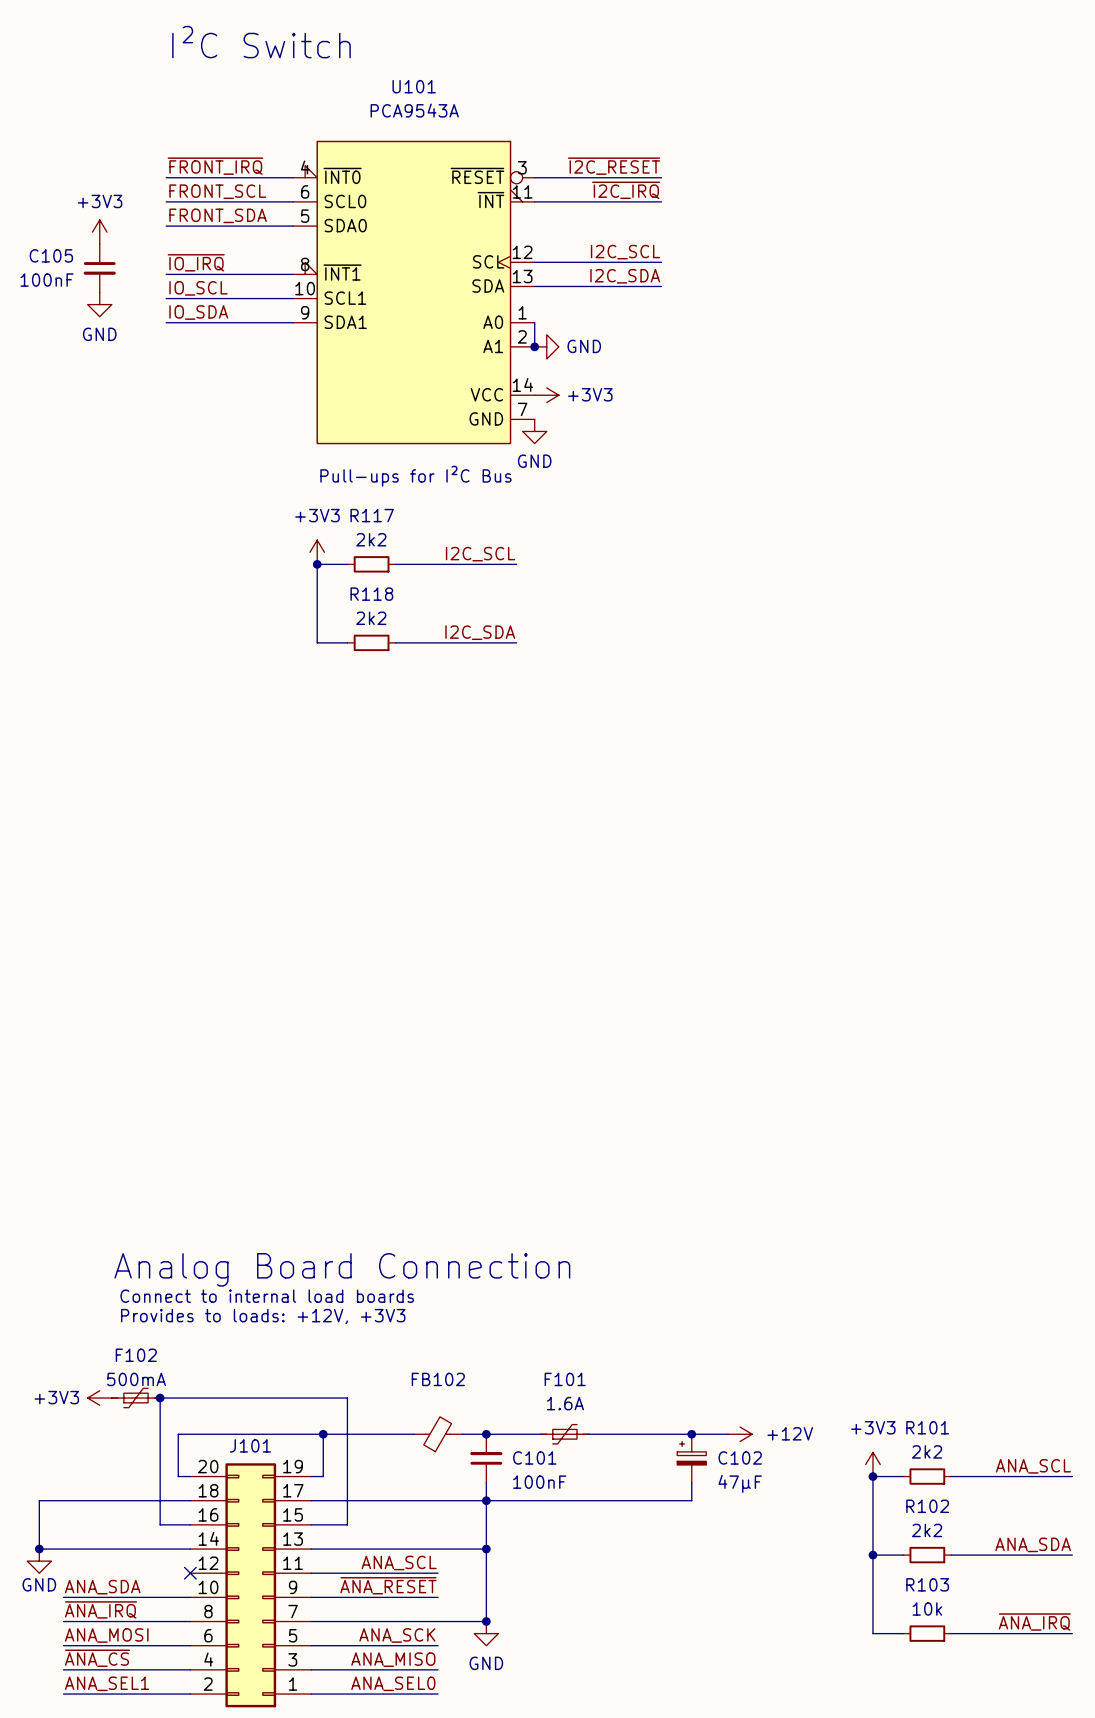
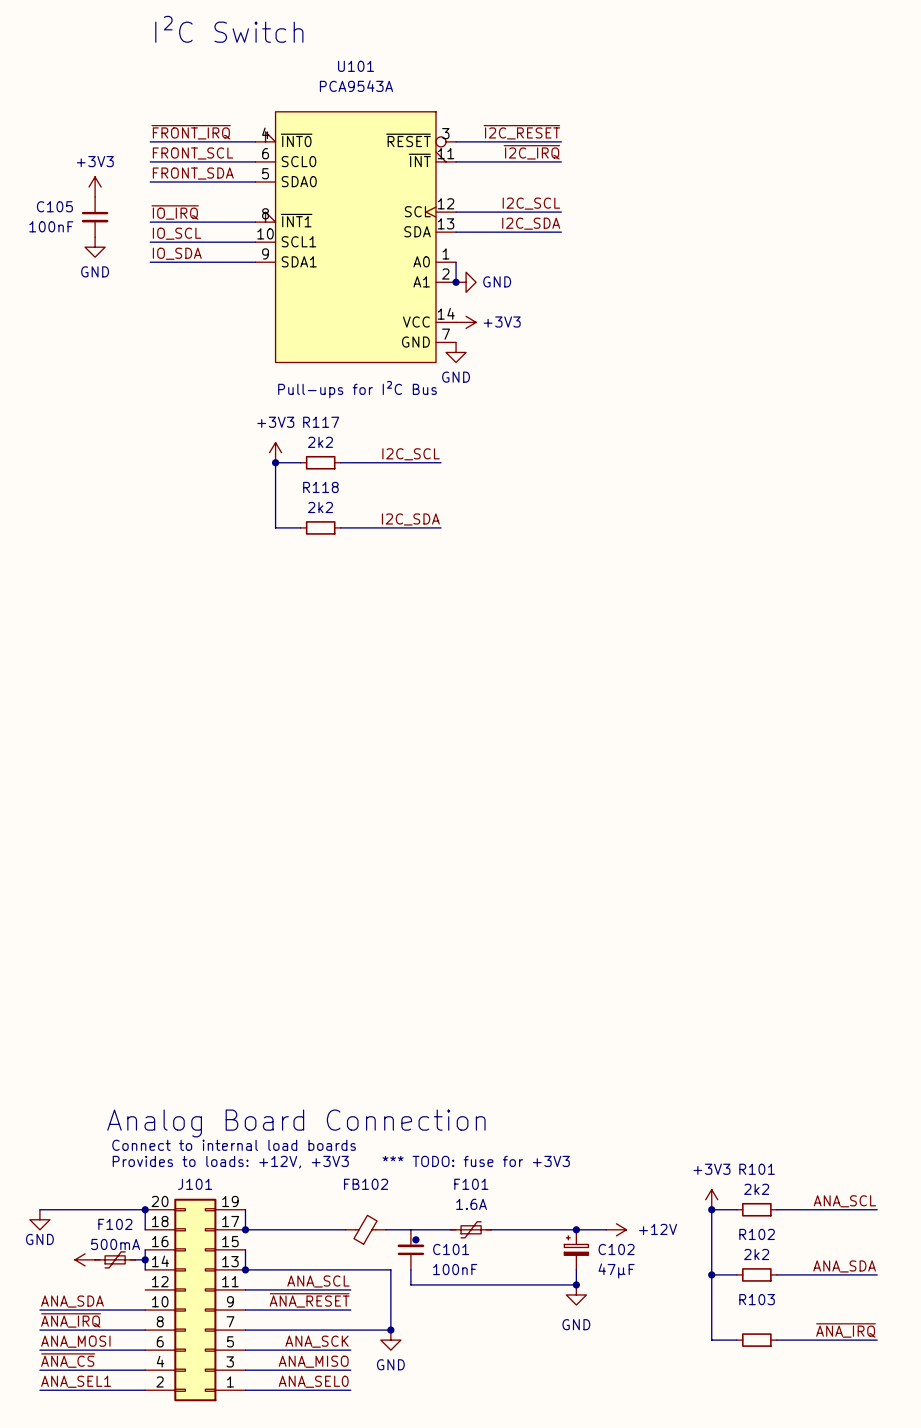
text position: Analog Board Connection (342, 1269) -> Analog Board Connection (296, 1123)
text position: Connect to internal load boards (267, 1296) -> Connect to internal load boards (234, 1145)
text position: Provides to loads: +12V, +3V3 (263, 1316) -> Provides to loads: +12V, +3V3 (230, 1162)
power symbol: +3V3 (99, 1398) -> none
F102 position: (135, 1398) -> (115, 1259)
junction: (160, 1398) -> none
text: none -> *** TODO: fuse for +3V3 (476, 1161)
wire: (323, 1434) (323, 1476) (311, 1476) -> none
junction: (323, 1434) -> none
wire: (413, 1434) (178, 1434) (178, 1476) (190, 1476) -> none
FB102 position: (438, 1434) -> (365, 1229)
wire: (462, 1434) (540, 1434) -> (385, 1229) (451, 1229)
junction: (486, 1434) -> none
F101 position: (564, 1434) -> (471, 1229)
wire: (589, 1434) (728, 1434) -> (491, 1229) (606, 1229)
junction position: (691, 1434) -> (576, 1229)
power symbol position: +12V (740, 1434) -> +12V (616, 1229)
C101 position: (486, 1458) -> (410, 1249)
C102 position: (691, 1458) -> (576, 1249)
wire: (160, 1464) (160, 1398) (347, 1398) (347, 1524) (311, 1524) -> (145, 1209) (39, 1209)
junction: none -> (145, 1209)
wire: none -> (245, 1209) (245, 1229) (345, 1229)
power symbol position: +3V3 (872, 1464) -> +3V3 (711, 1199)
label position: ANA_SCL (1033, 1466) -> ANA_SCL (844, 1201)
junction position: (872, 1476) -> (711, 1209)
wire: (903, 1476) (872, 1476) (872, 1633) (903, 1633) -> (736, 1209) (711, 1209) (711, 1340) (736, 1340)
R101 position: (927, 1476) -> (756, 1209)
wire: (951, 1476) (1072, 1476) -> (776, 1209) (877, 1209)
wire: (486, 1482) (486, 1621) (311, 1621) -> none
wire: (691, 1482) (691, 1500) (311, 1500) -> none
wire: (160, 1488) (160, 1512) -> none
junction: none -> (245, 1229)
wire: (190, 1500) (39, 1500) (39, 1549) (190, 1549) -> none
wire: none -> (245, 1249) (245, 1269) (390, 1269) (390, 1330) (245, 1330)
power symbol: none -> (85, 1259)
wire: none -> (135, 1259) (145, 1259) (145, 1269)
wire: (160, 1524) (190, 1524) -> none
junction: none -> (145, 1259)
junction: none -> (245, 1269)
wire: none -> (410, 1269) (410, 1284) (576, 1284) (576, 1269)
label position: ANA_SDA (1033, 1544) -> ANA_SDA (844, 1266)
junction: (39, 1549) -> none
wire: (311, 1549) (486, 1549) -> none
junction: (486, 1549) -> none
junction: none -> (576, 1284)
wire: (872, 1555) (903, 1555) -> (711, 1274) (736, 1274)
junction position: (872, 1555) -> (711, 1274)
R102 position: (927, 1555) -> (756, 1274)
wire: (951, 1555) (1072, 1555) -> (776, 1274) (877, 1274)
power symbol position: GND (39, 1561) -> GND (39, 1219)
label position: ANA_SCL (399, 1563) -> ANA_SCL (318, 1281)
power symbol: none -> GND (576, 1294)
no-connect mark: (190, 1573) -> none
wire: (311, 1573) (438, 1573) -> (245, 1289) (350, 1289)
J101 position: (250, 1585) -> (195, 1299)
label position: ~{ANA_RESET} (388, 1585) -> ~{ANA_RESET} (309, 1300)
label position: ANA_SDA (102, 1587) -> ANA_SDA (72, 1301)
wire: (63, 1597) (190, 1597) -> (39, 1310) (145, 1310)
wire: (311, 1597) (438, 1597) -> (245, 1310) (350, 1310)
label position: ~{ANA_IRQ} (100, 1609) -> ~{ANA_IRQ} (71, 1320)
R103 value: 10k (927, 1609) -> none
wire: (63, 1621) (190, 1621) -> (39, 1330) (145, 1330)
junction position: (486, 1621) -> (390, 1330)
label position: ~{ANA_IRQ} (1034, 1622) -> ~{ANA_IRQ} (846, 1330)
power symbol position: GND (486, 1633) -> GND (390, 1340)
R103 position: (927, 1633) -> (756, 1340)
wire: (951, 1633) (1072, 1633) -> (776, 1340) (877, 1340)
label position: ANA_MOSI (106, 1635) -> ANA_MOSI (75, 1341)
label position: ANA_SCK (397, 1635) -> ANA_SCK (317, 1341)
wire: (63, 1645) (190, 1645) -> (39, 1350) (145, 1350)
wire: (311, 1645) (438, 1645) -> (245, 1350) (350, 1350)
label position: ~{ANA_CS} (97, 1658) -> ~{ANA_CS} (68, 1360)
label position: ANA_MISO (393, 1659) -> ANA_MISO (313, 1361)
wire: (63, 1669) (190, 1669) -> (39, 1370) (145, 1370)
wire: (311, 1669) (438, 1669) -> (245, 1370) (350, 1370)
label position: ANA_SEL1 (107, 1683) -> ANA_SEL1 (76, 1381)
label position: ANA_SEL0 (393, 1683) -> ANA_SEL0 (313, 1381)
wire: (63, 1694) (190, 1694) -> (39, 1390) (145, 1390)
wire: (311, 1694) (438, 1694) -> (245, 1390) (350, 1390)

